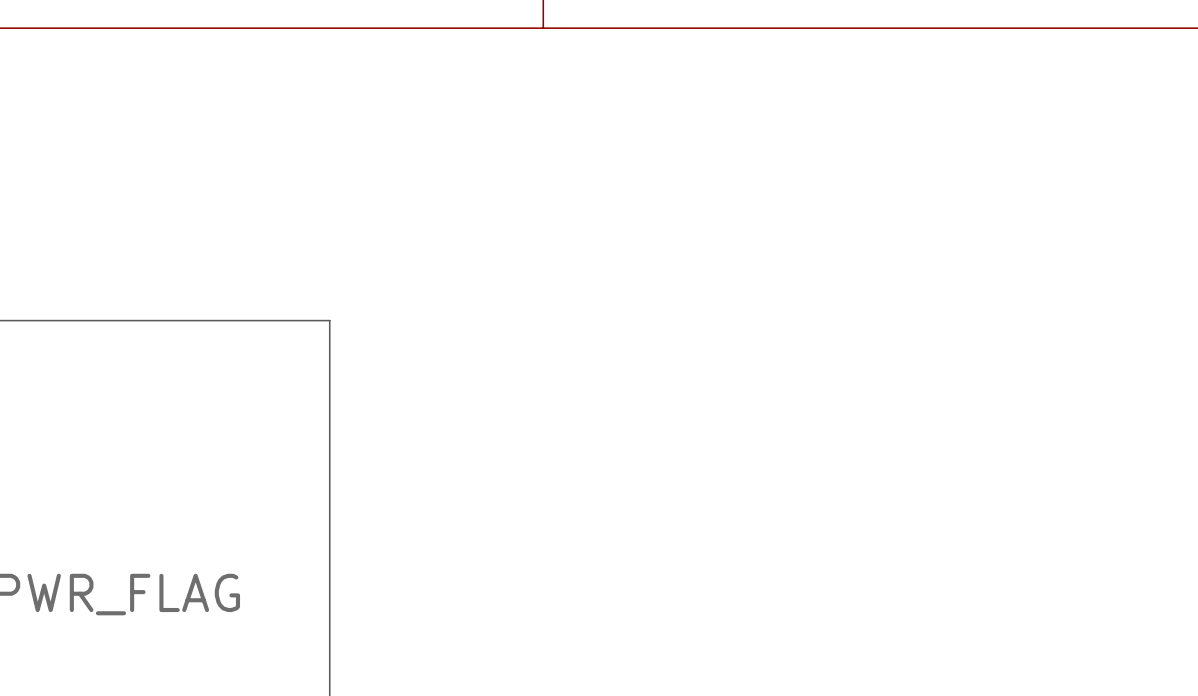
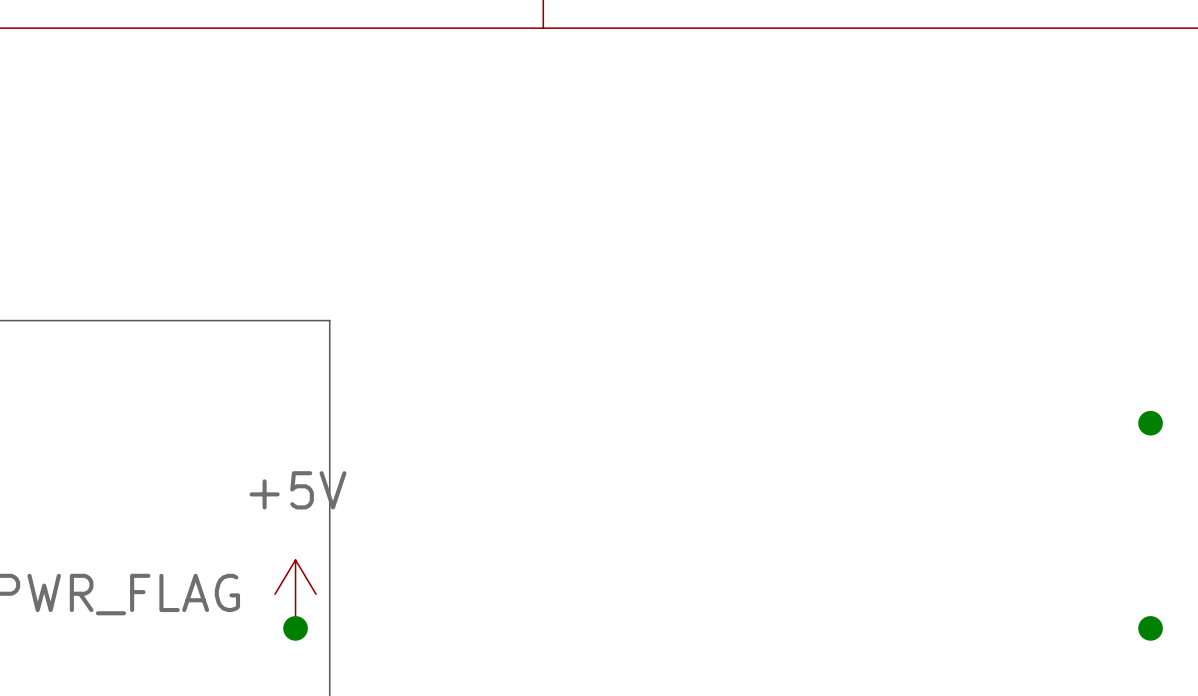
junction: none -> (1150, 423)
power symbol: none -> +5V (295, 594)
junction: none -> (295, 628)
junction: none -> (1150, 628)

